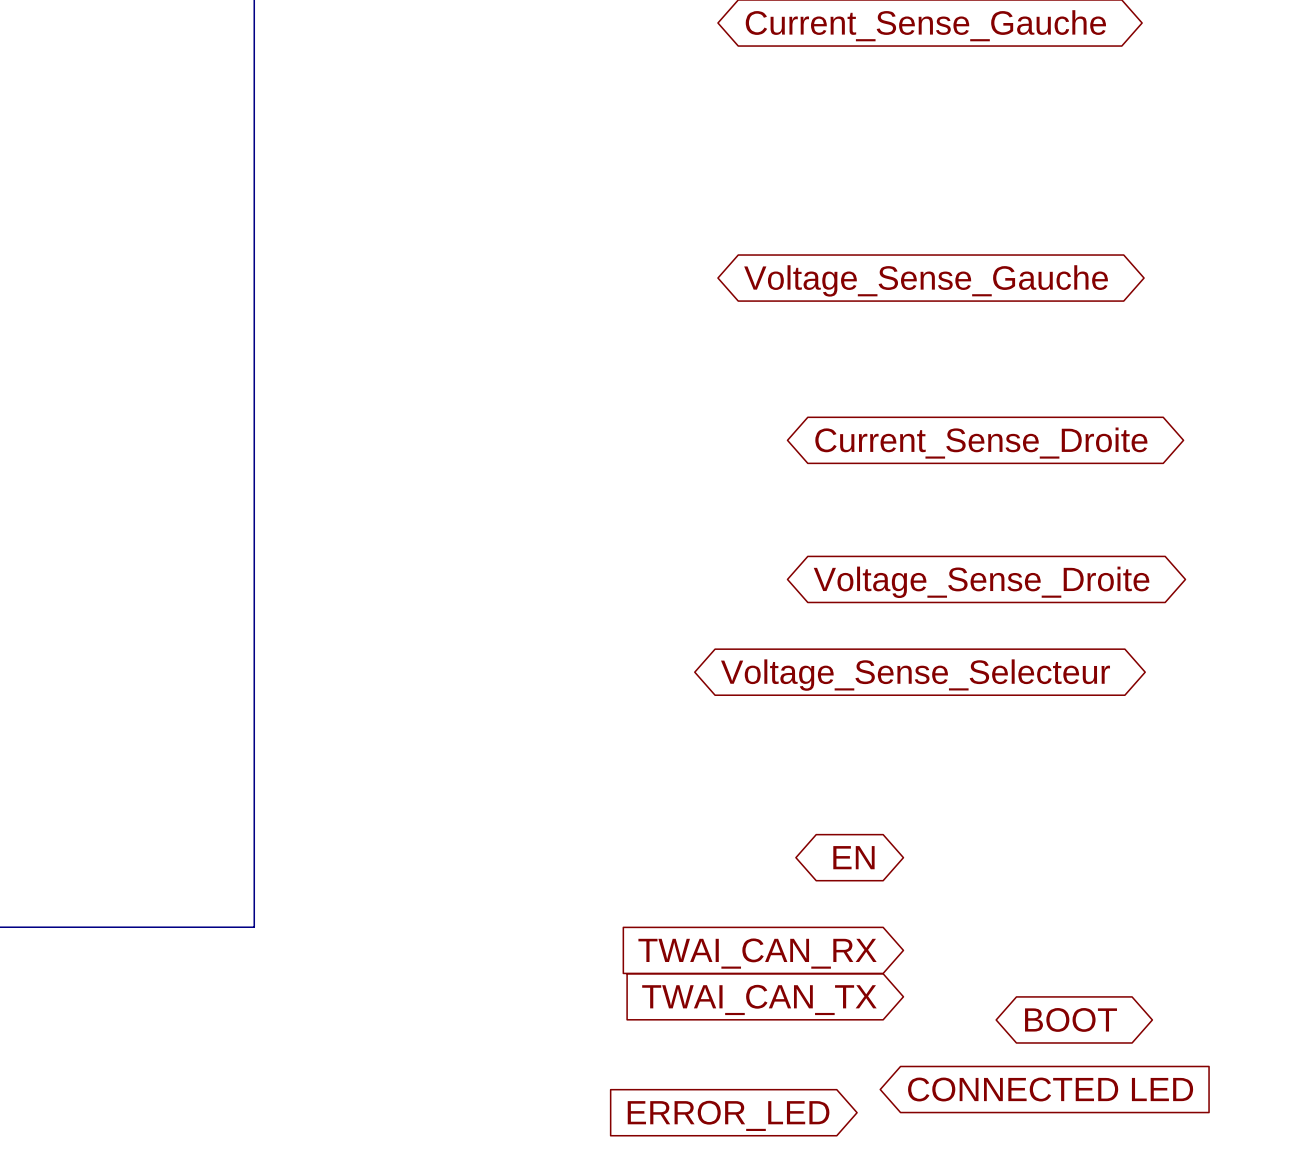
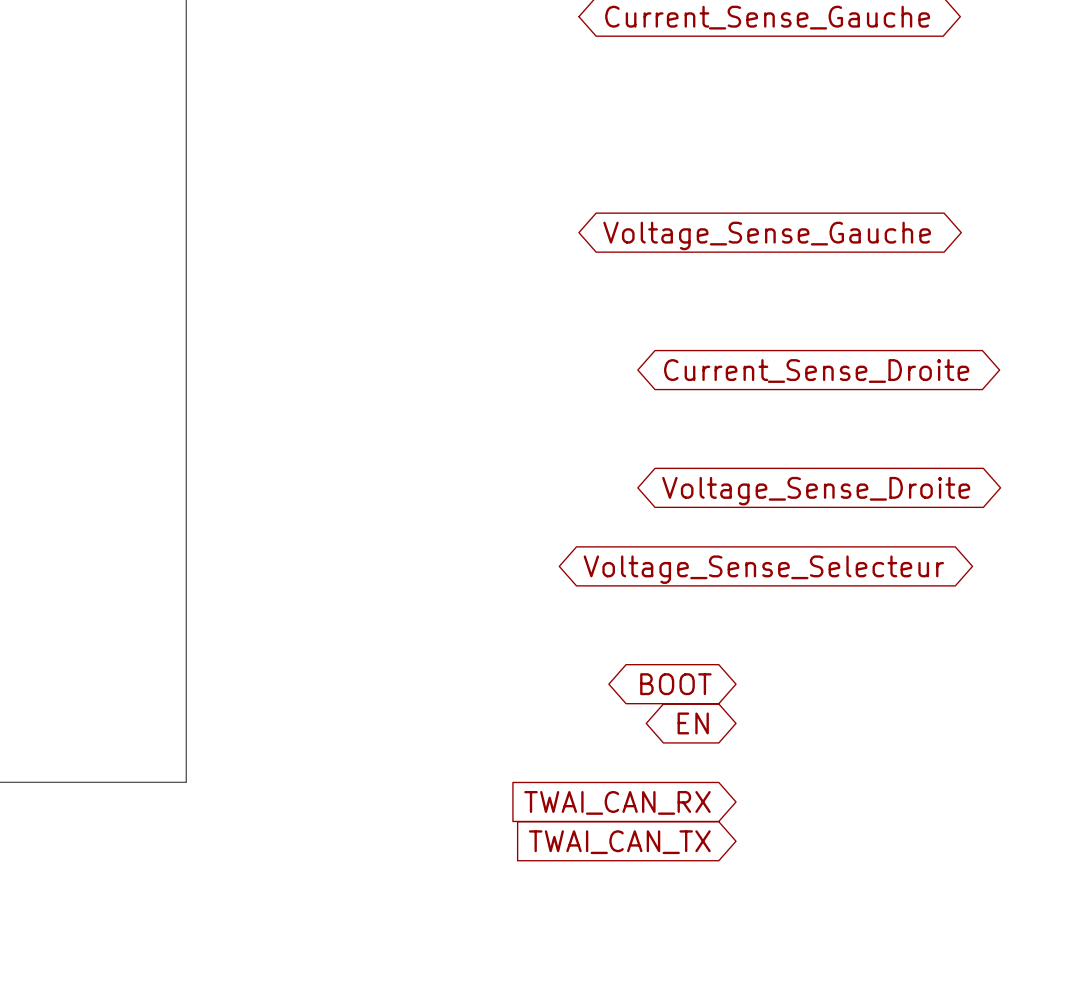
global label rotation: 0° (1071, 1019) -> 180° (675, 684)
global label position: BOOT (1071, 1019) -> BOOT (675, 684)
global label: CONNECTED LED (1050, 1089) -> none
global label: ERROR_LED (728, 1115) -> none

